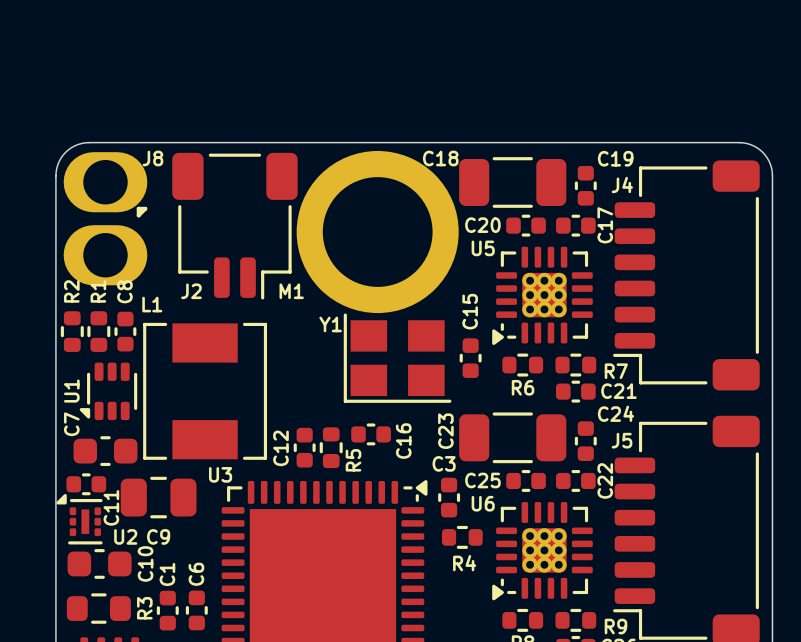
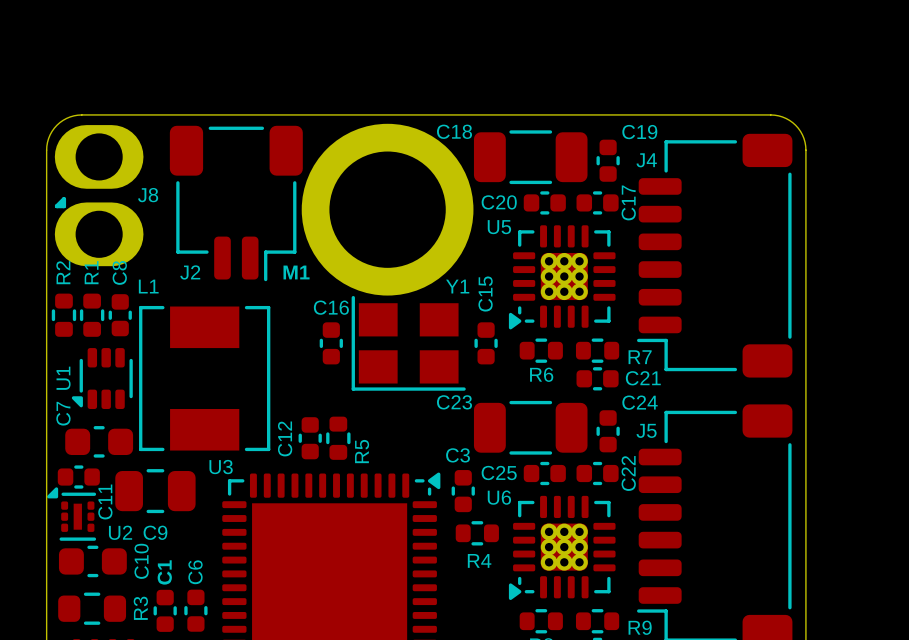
J8 name position: J8 (152, 158) -> J8 (148, 195)
J8 rotation: 0° (105, 218) -> 180° (99, 195)
Y1 name position: Y1 (330, 324) -> Y1 (457, 286)
C23 name rotation: 0° (445, 431) -> 90° clockwise (454, 402)
C16 rotation: 0° (371, 434) -> 90° clockwise (331, 343)
C16 position: (371, 434) -> (331, 343)

